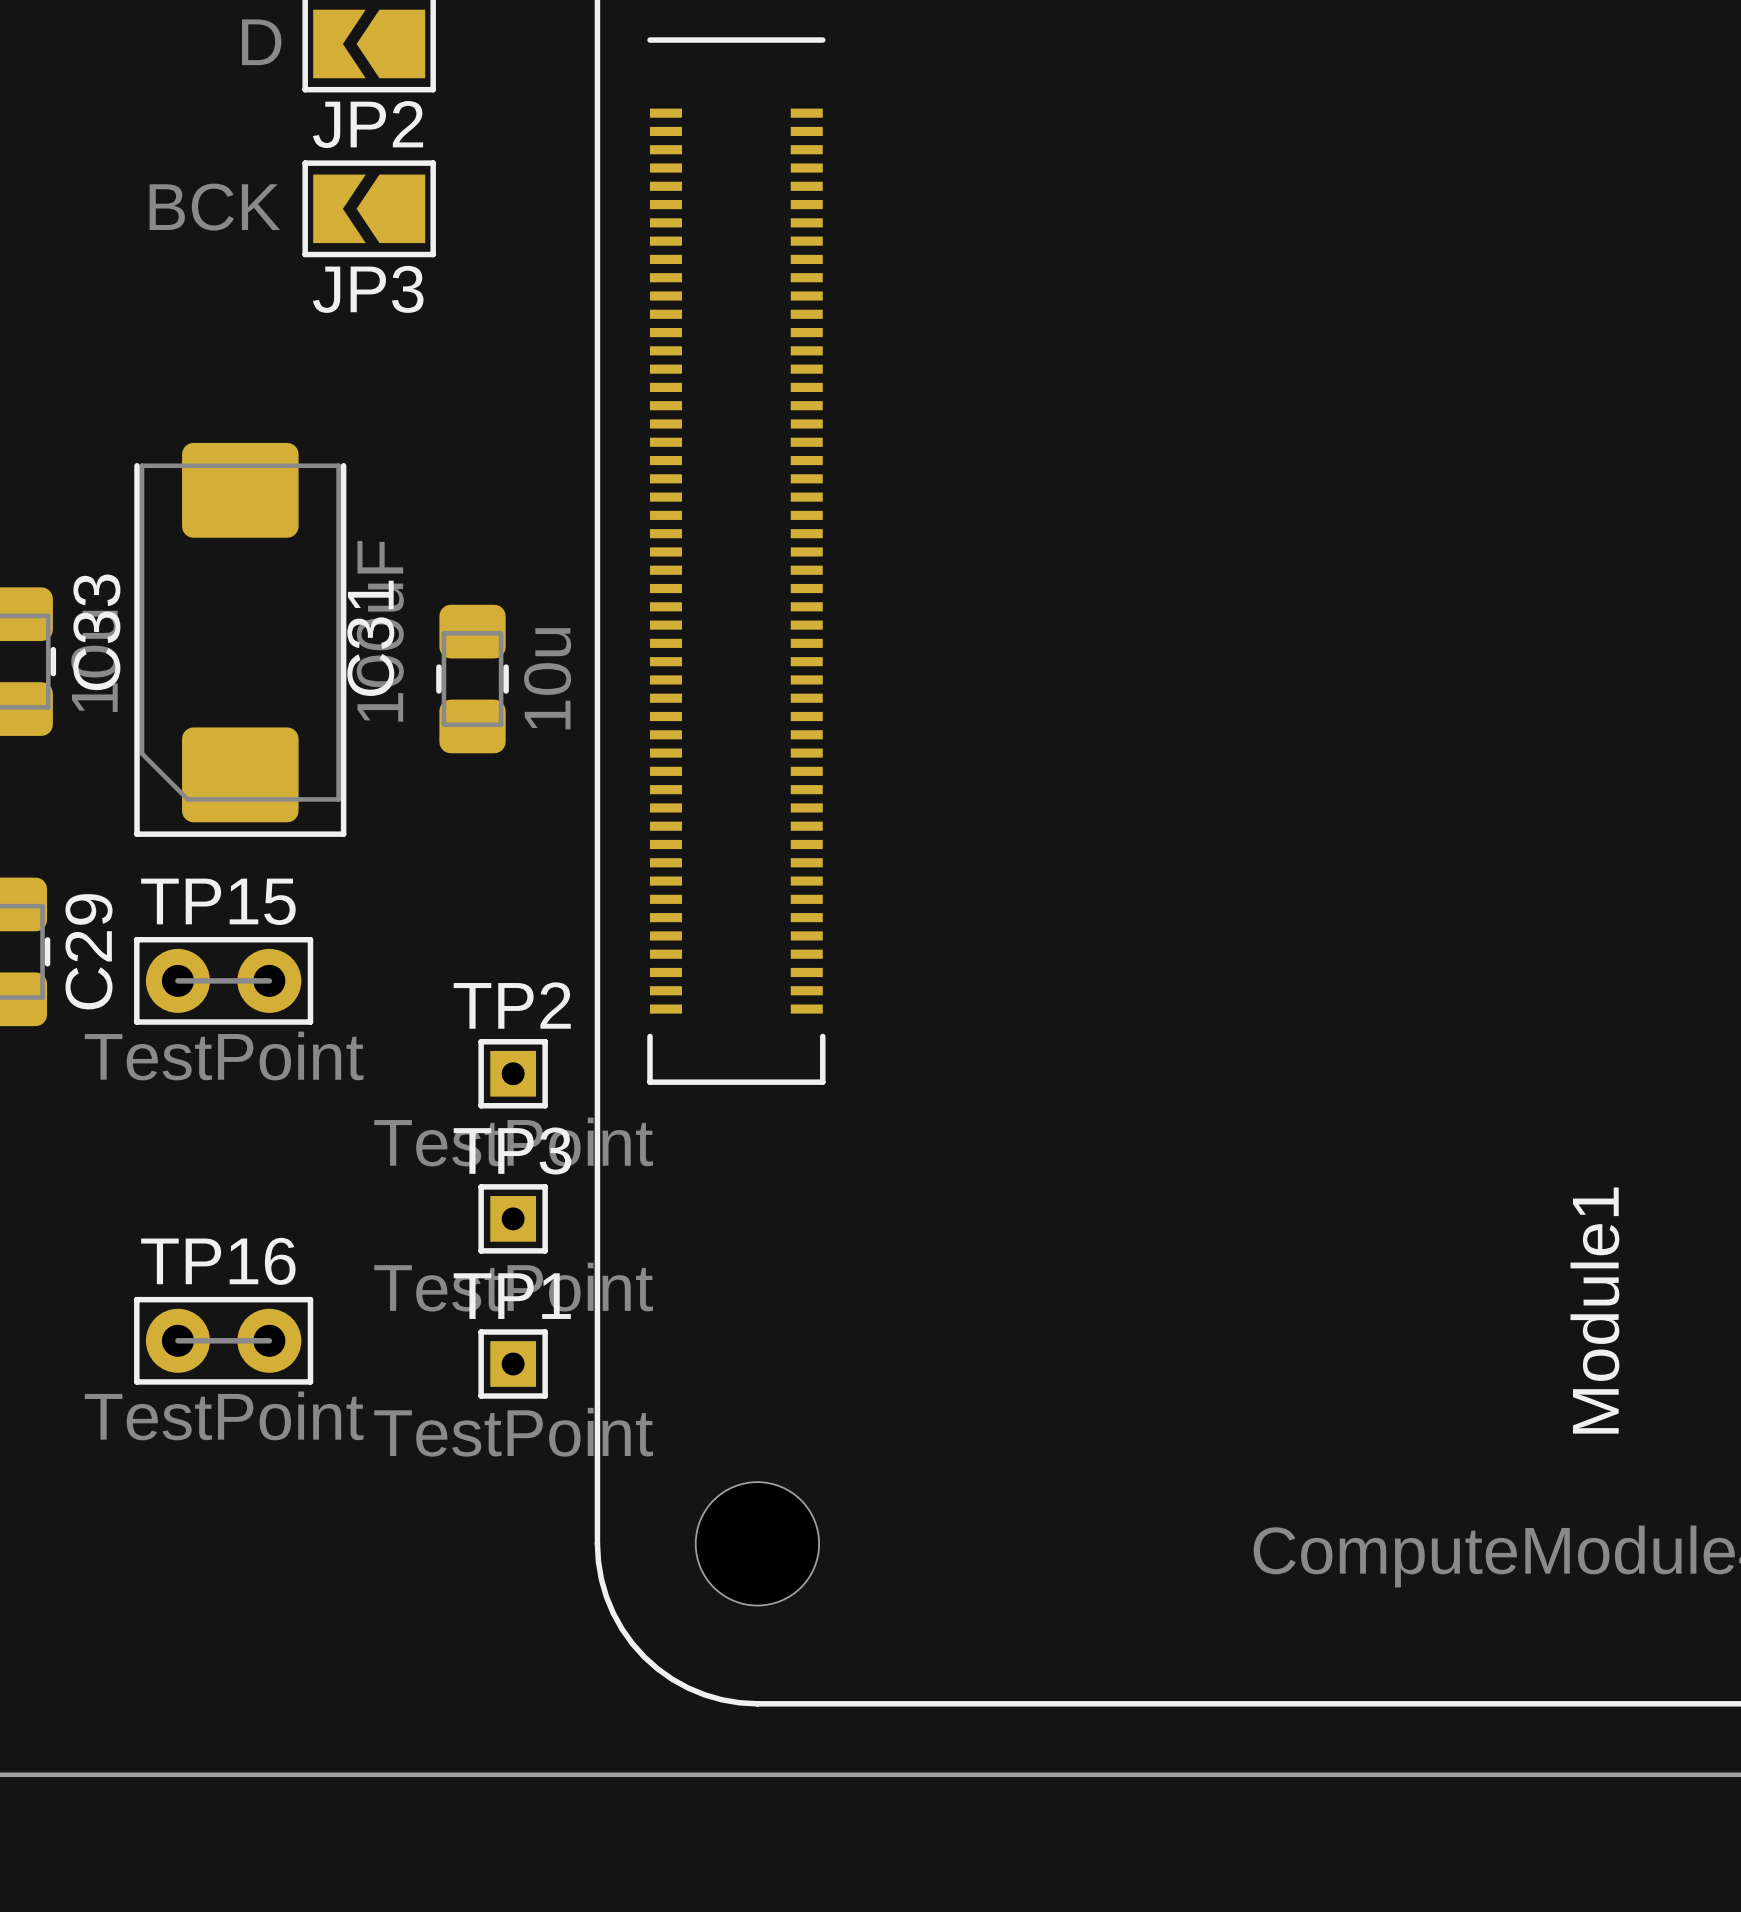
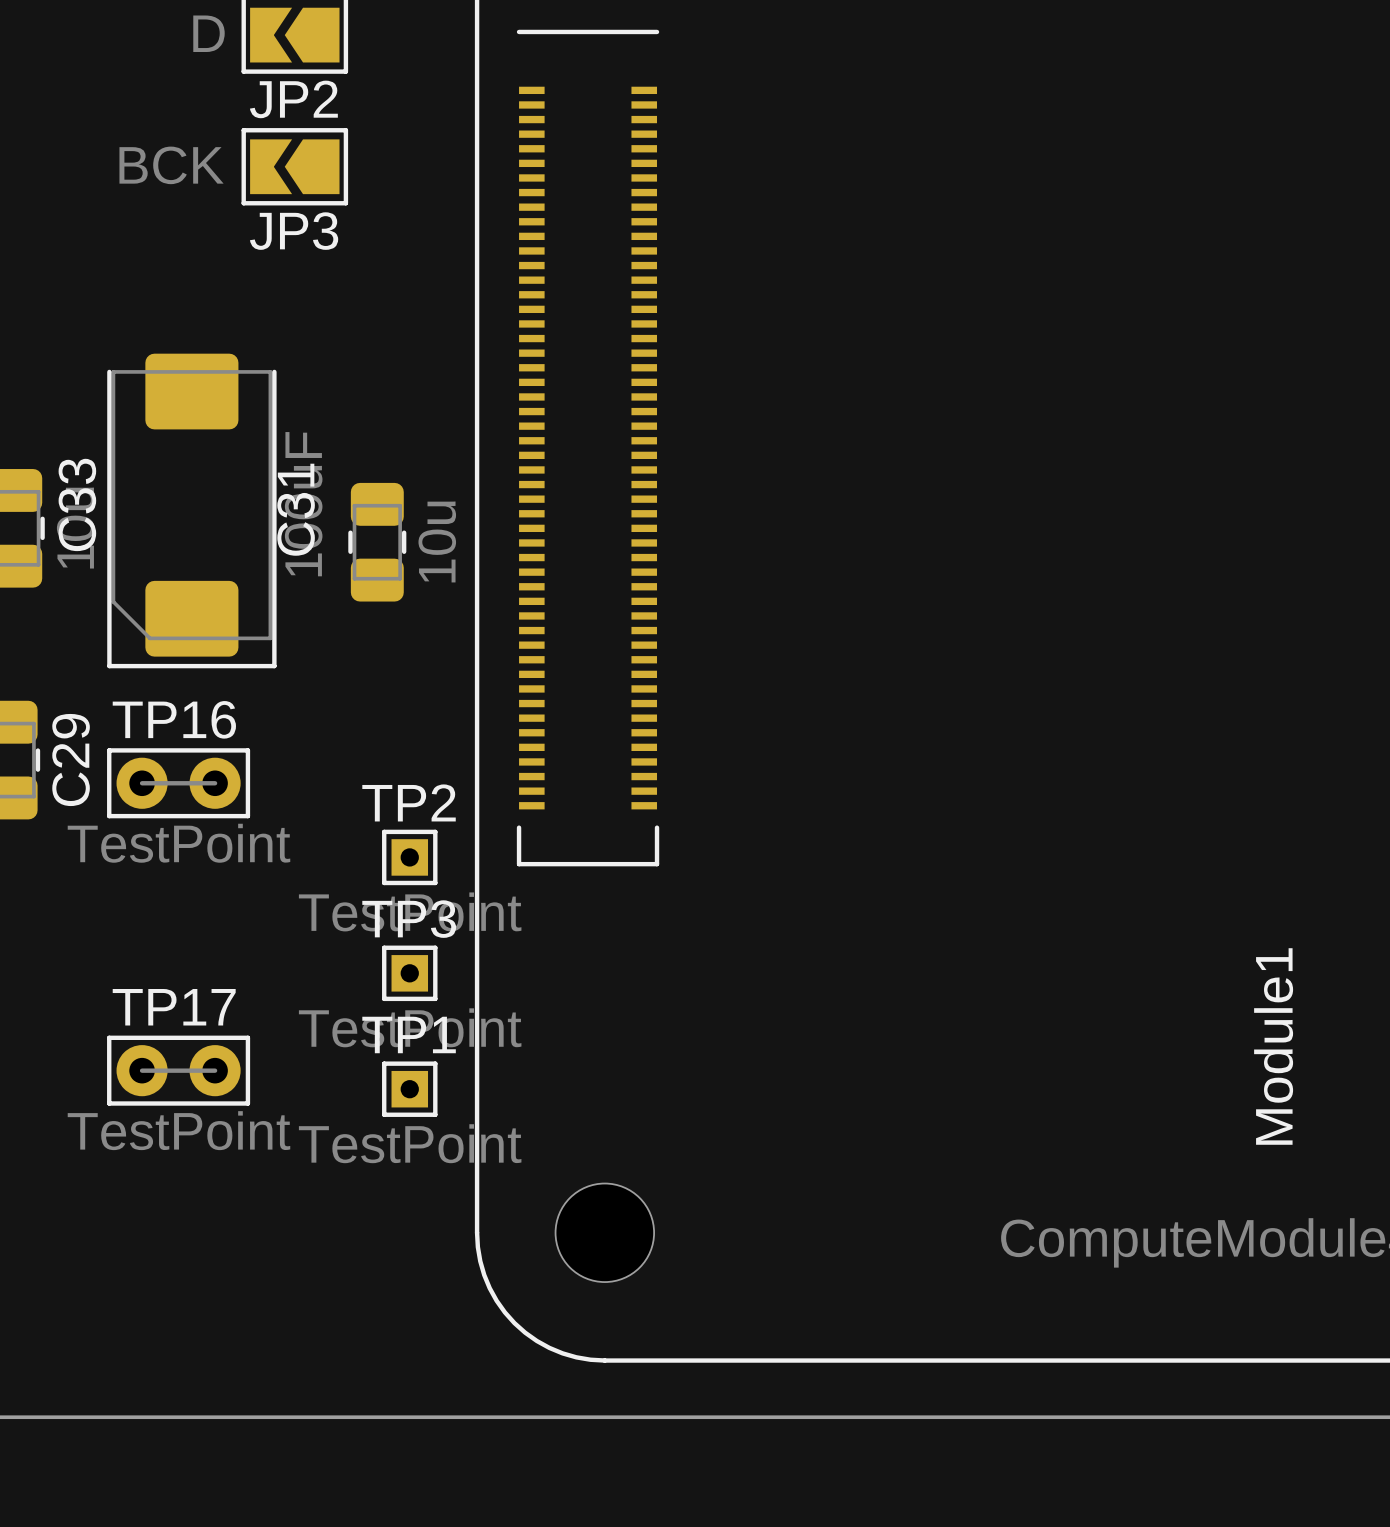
TP15 name: TP15 (218, 901) -> TP16 (174, 719)
TP16 name: TP16 (218, 1261) -> TP17 (174, 1007)

